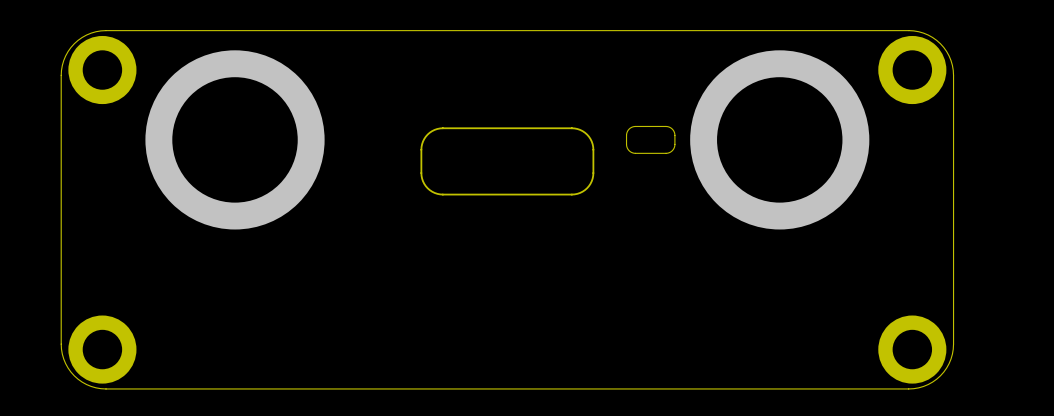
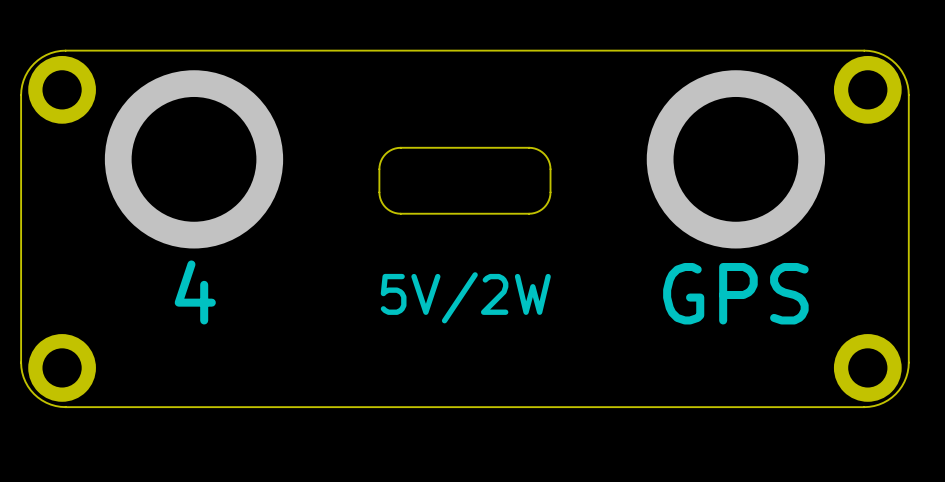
board edge: (635, 126) (670, 127) (674, 134) (673, 148) (667, 153) (631, 152) (626, 146) (626, 134) (630, 128) (635, 126) -> none
text: none -> 4 (195, 292)
text: none -> GPS (735, 293)
text: none -> 5V/2W (465, 297)

